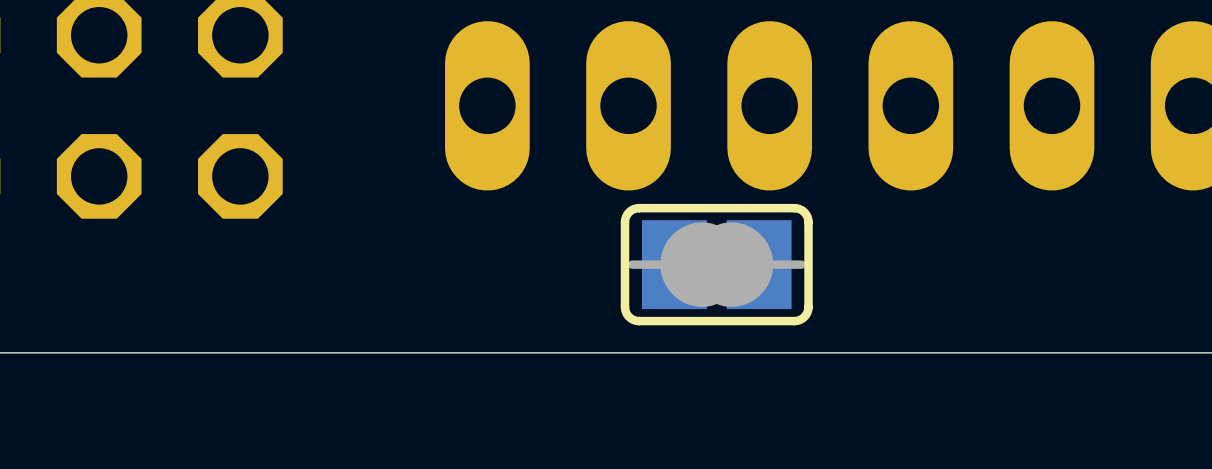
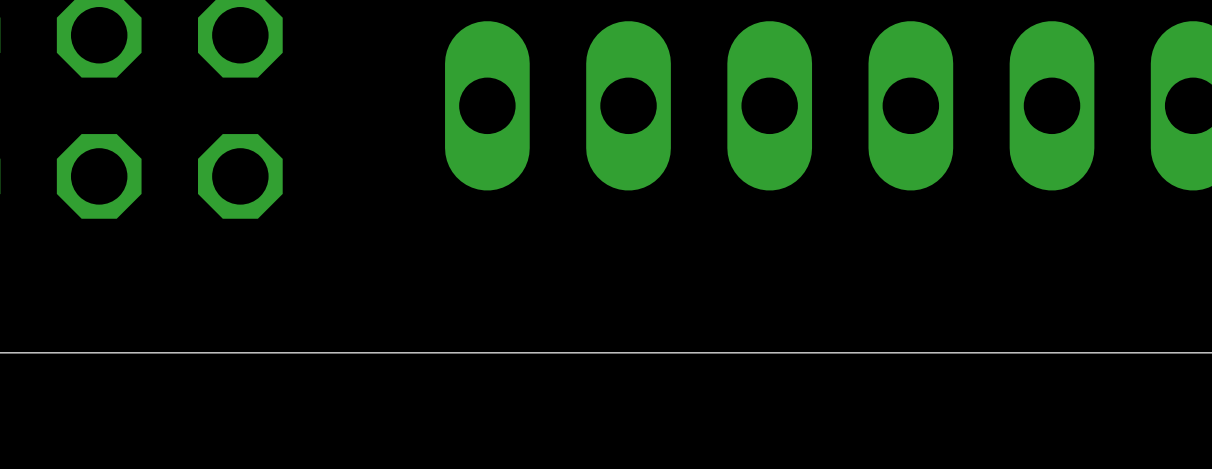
part: (716, 264) -> none

